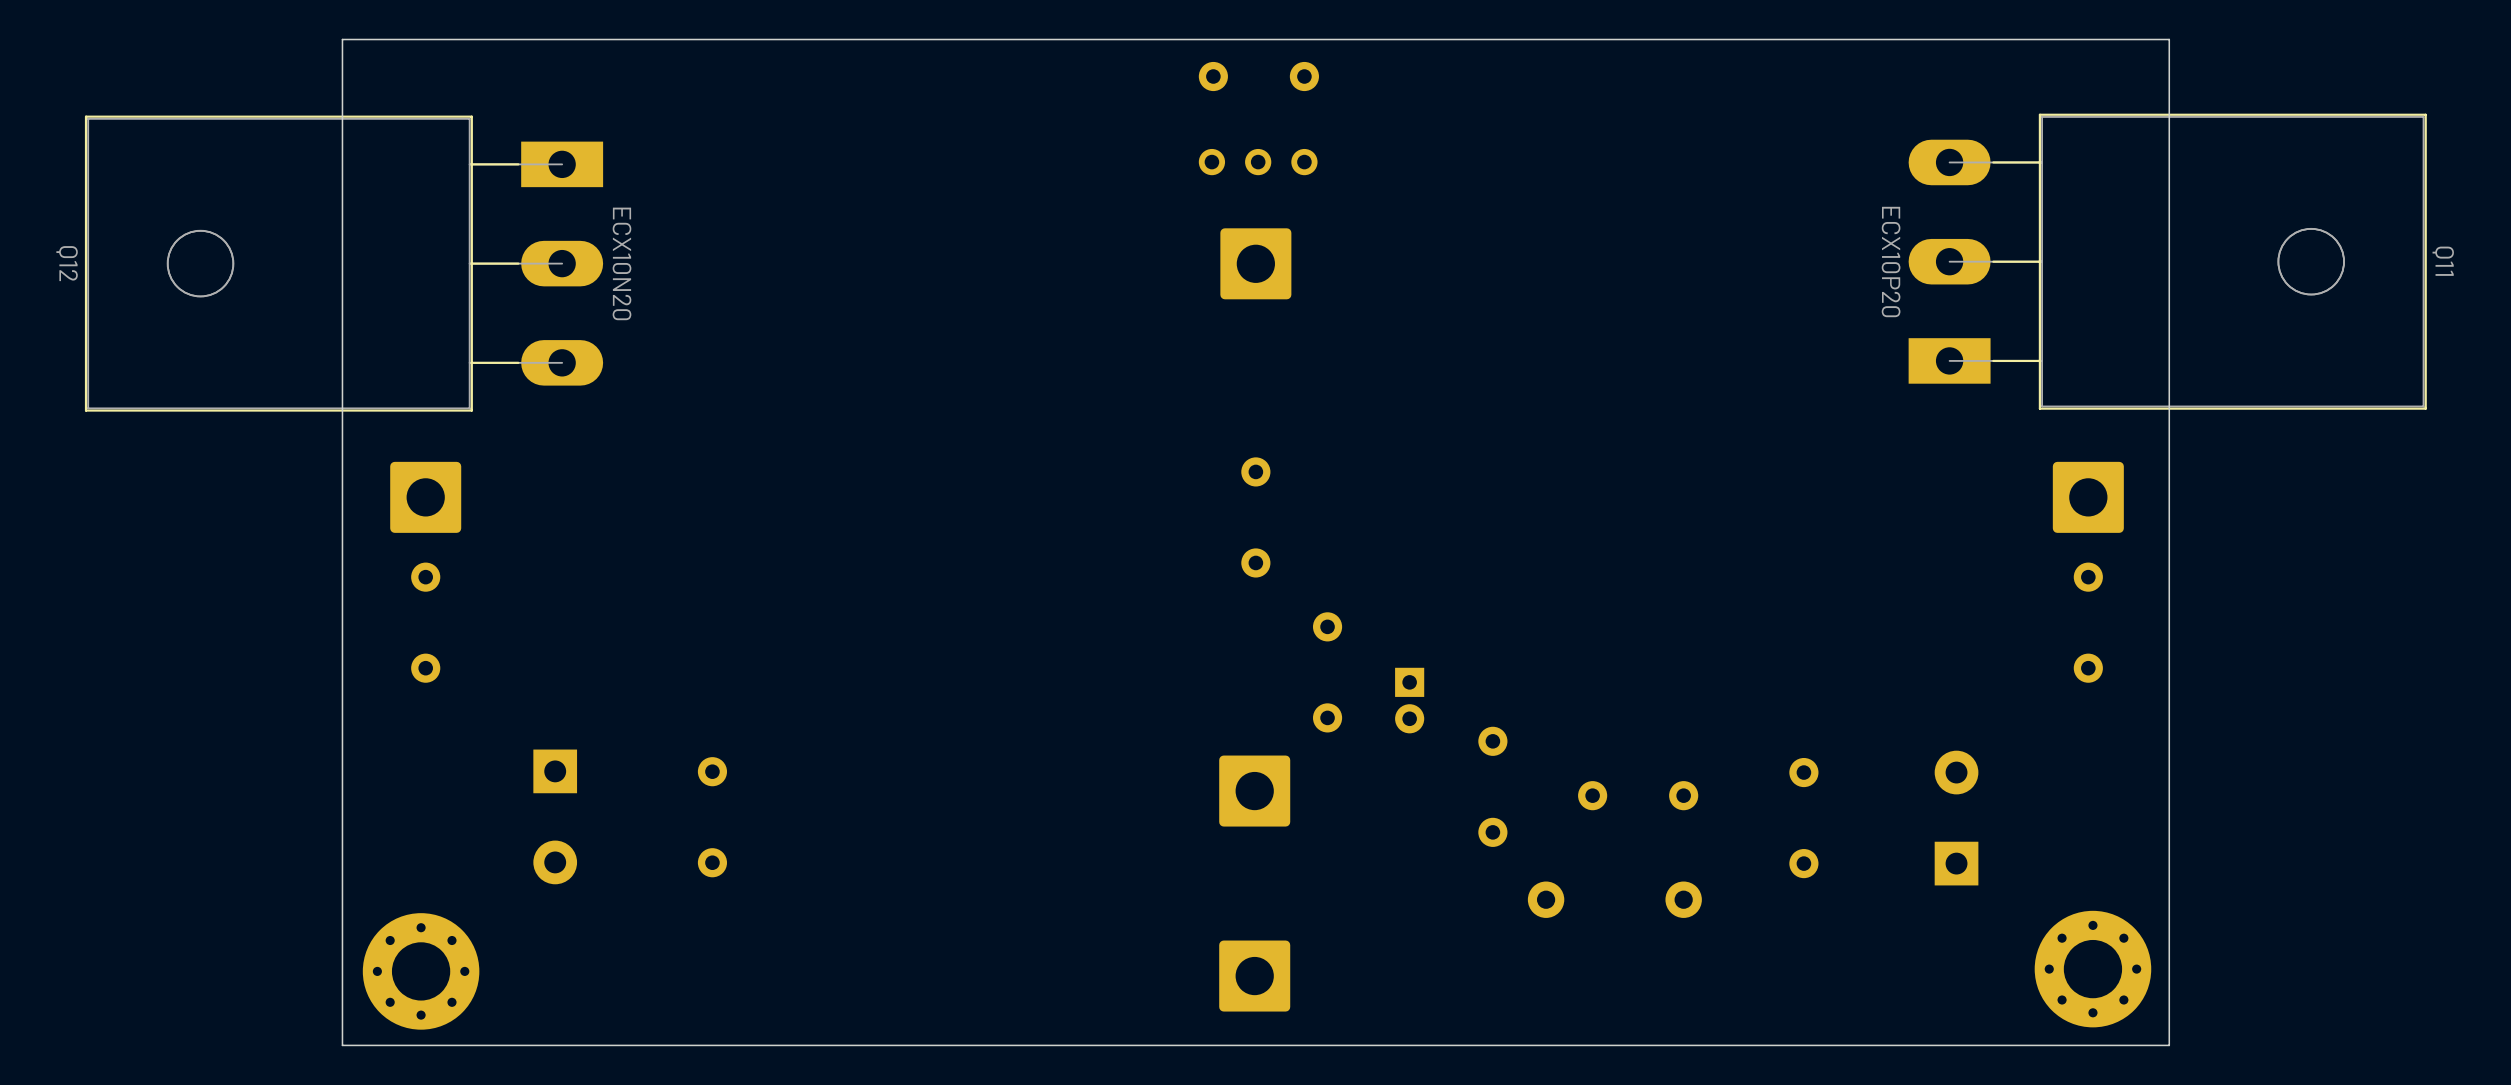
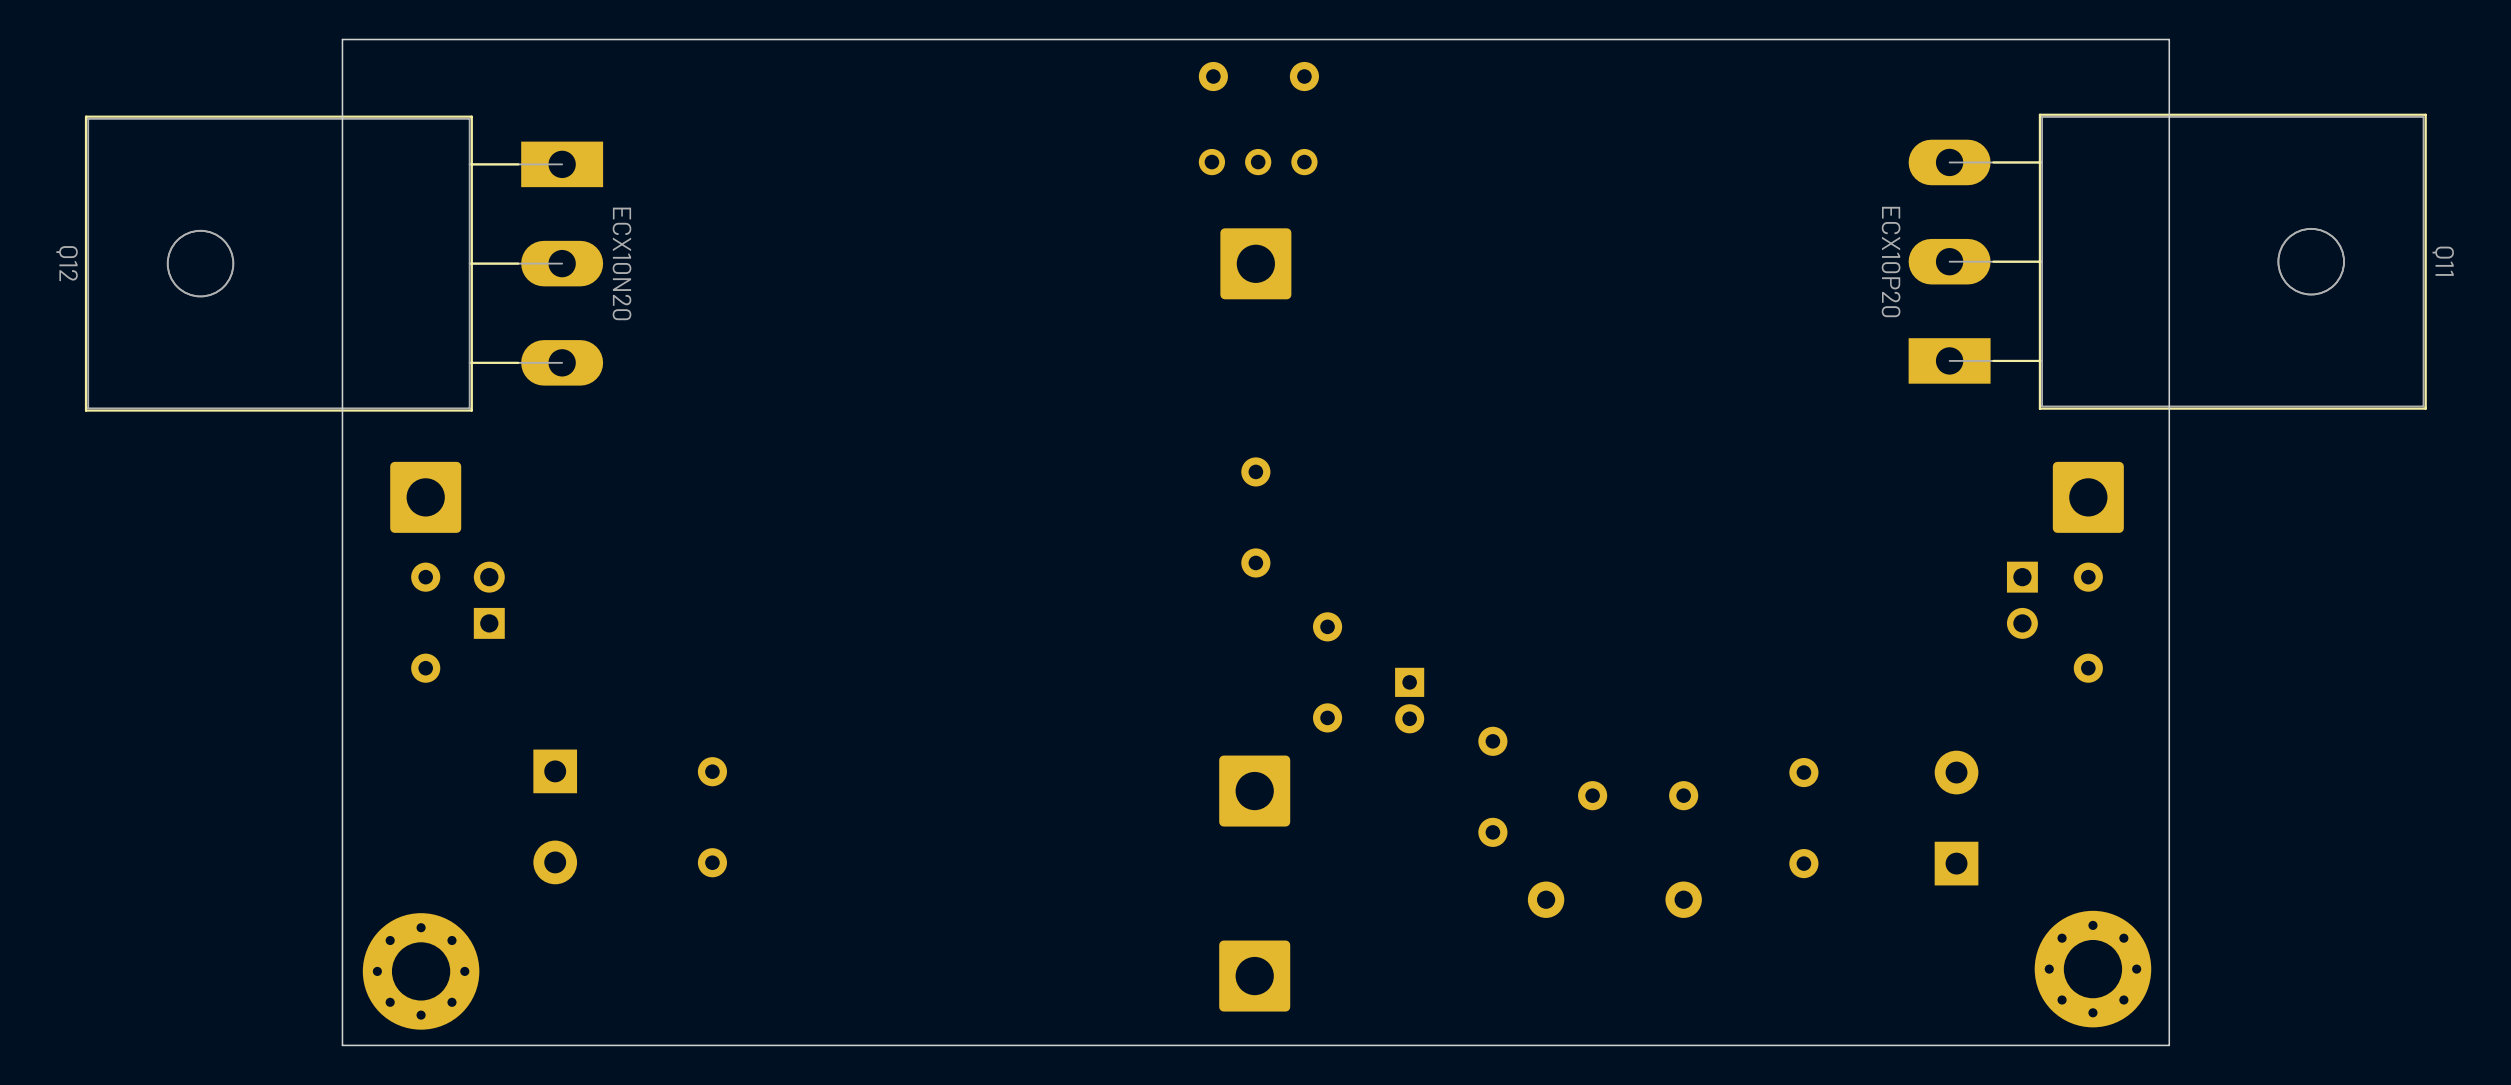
part: none -> (489, 600)
part: none -> (2022, 600)

